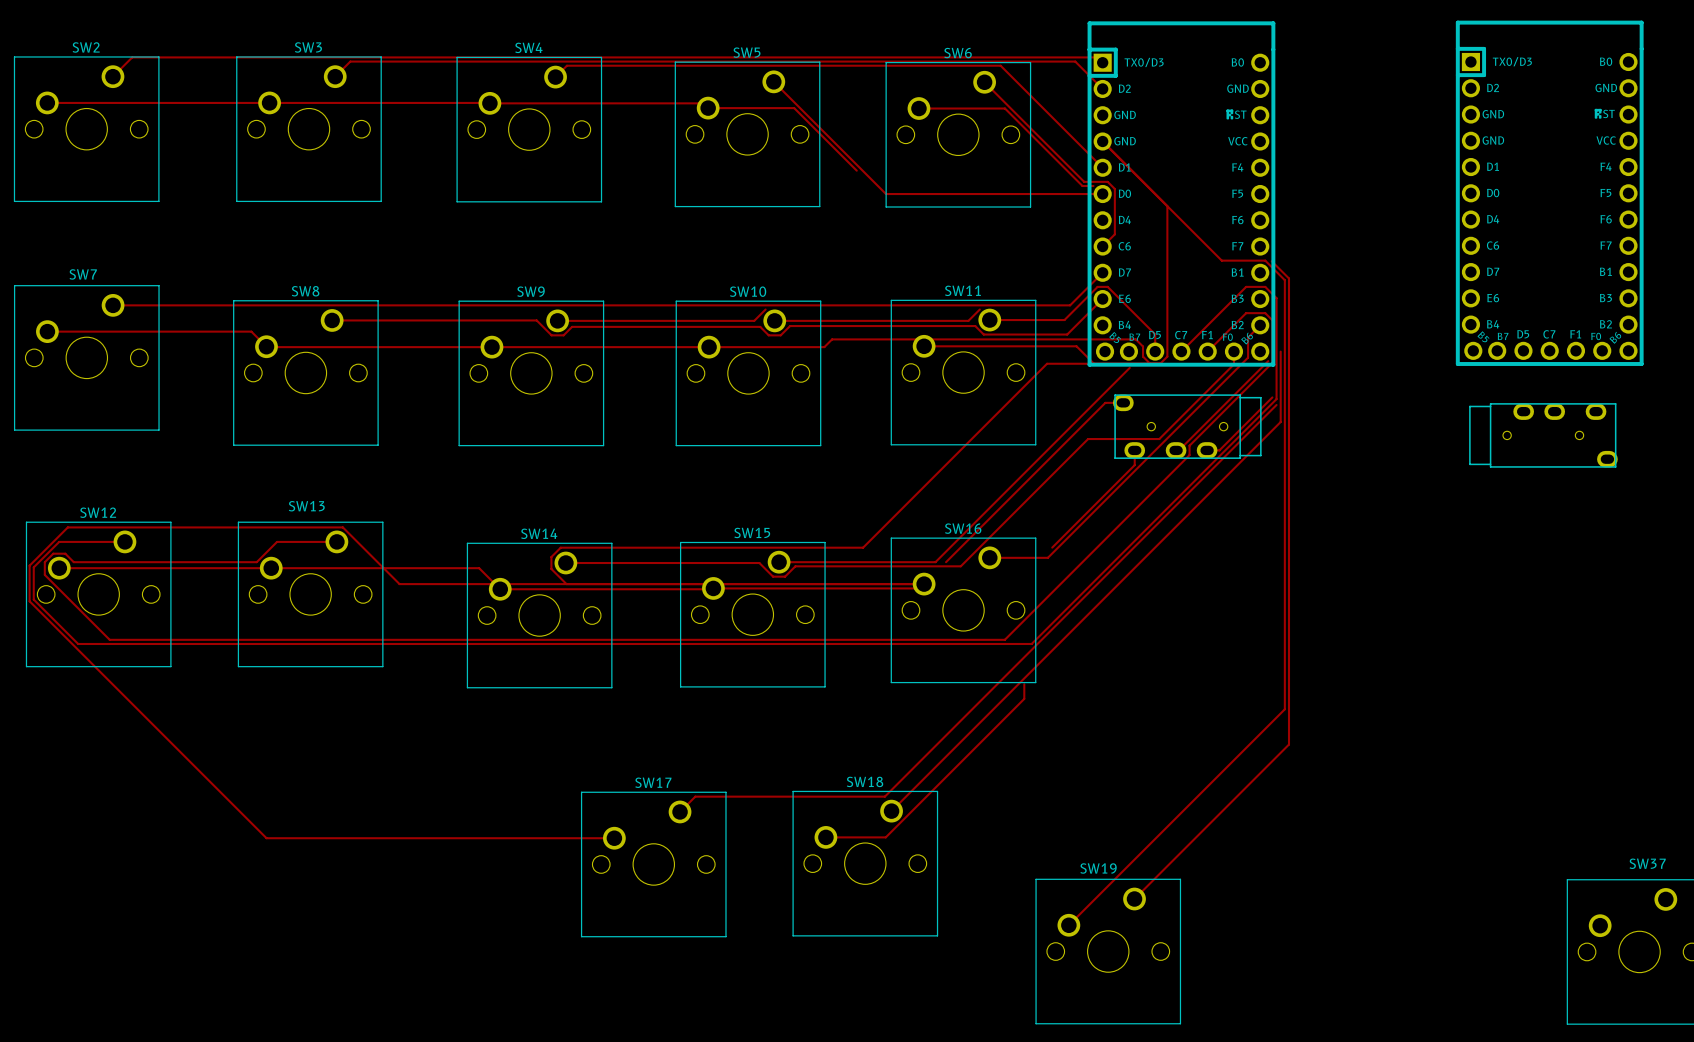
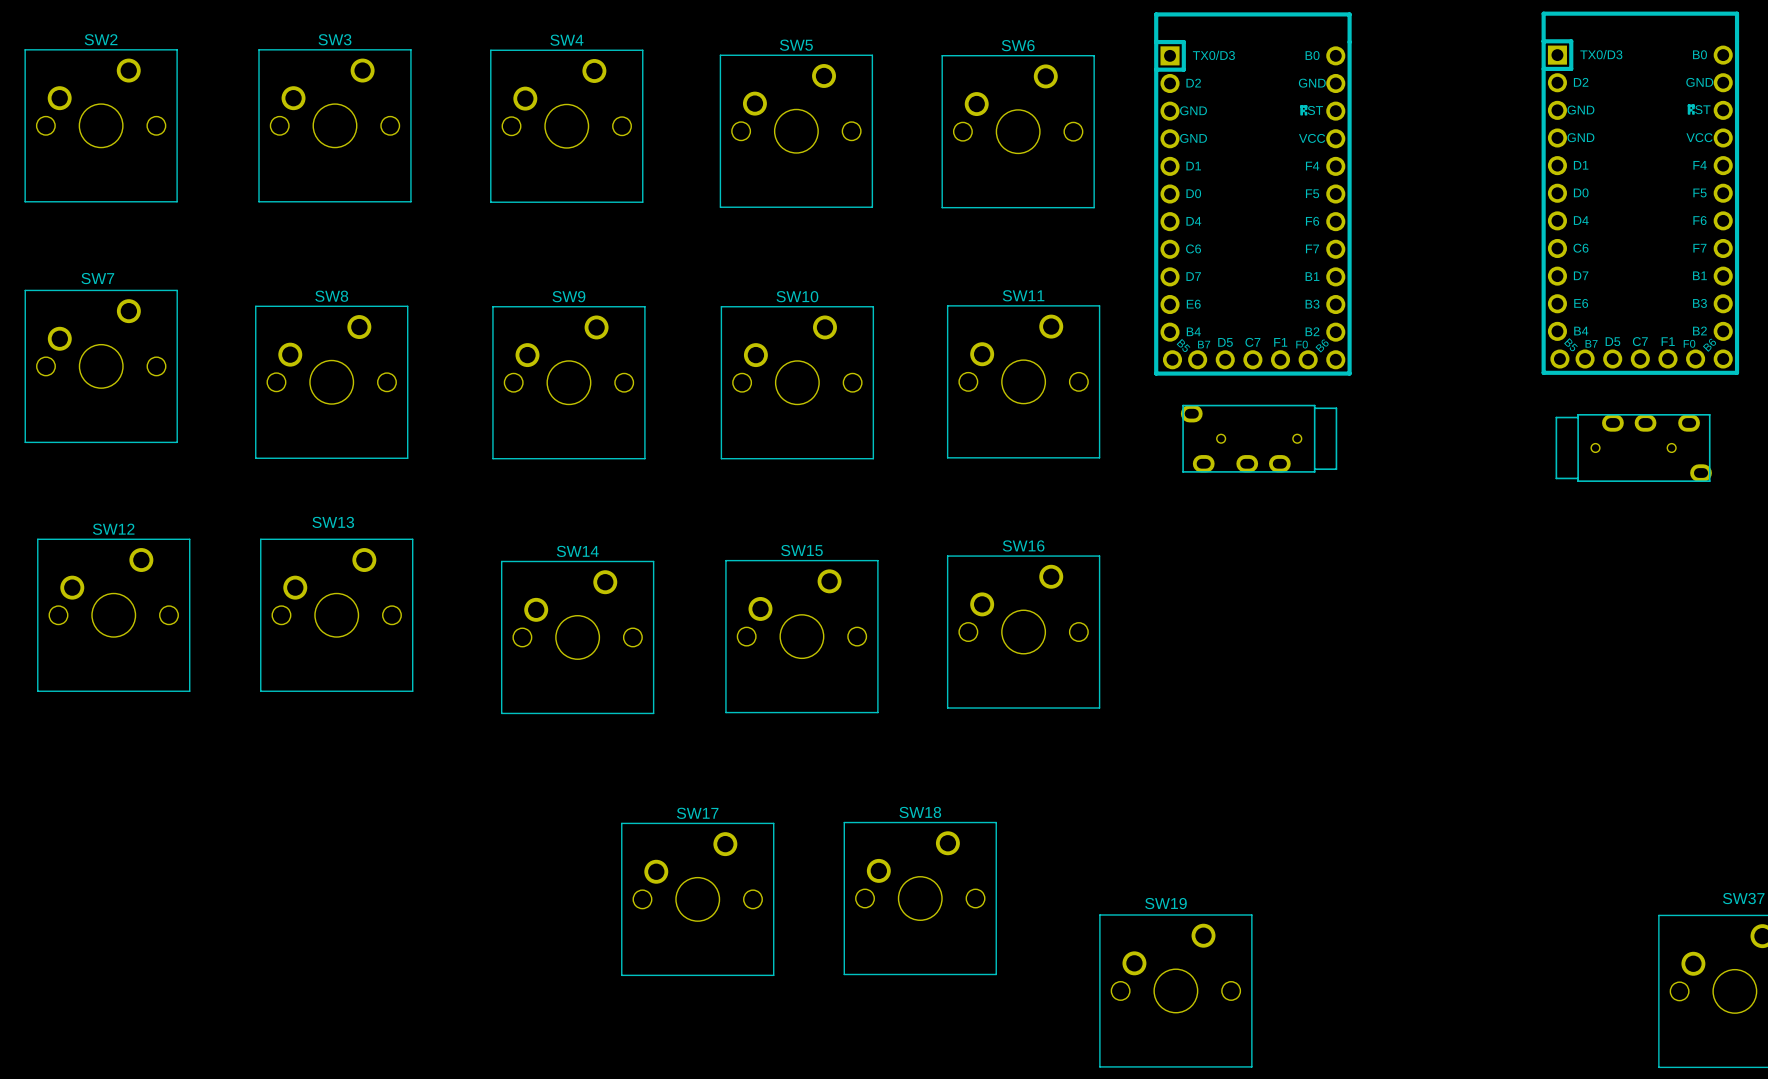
top track: (1102, 62) (1097, 57) (132, 57) (112, 76) -> none
top track: (335, 76) (350, 61) (1075, 61) (1102, 88) -> none
top track: (555, 77) (566, 65) (1000, 65) (1102, 167) -> none
top track: (773, 81) (885, 194) (1102, 194) -> none
top track: (984, 82) (1084, 181) (1107, 181) (1114, 188) (1114, 234) (1102, 246) -> none
top track: (47, 102) (703, 103) (708, 108) (794, 108) (856, 170) -> none
top track: (918, 108) (1005, 108) (1082, 185) (1093, 185) -> none
top track: (1102, 141) (1221, 260) (1265, 260) (1284, 280) (1284, 709) (1068, 925) -> none
top track: (1167, 206) (1167, 356) (1160, 363) (1047, 363) (863, 547) (560, 547) (551, 557) (551, 569) (566, 584) -> none
top track: (1271, 261) (1288, 278) (1288, 744) (1134, 899) -> none
top track: (1102, 272) (1070, 305) (113, 305) -> none
top track: (1102, 299) (1067, 334) (983, 334) (975, 326) (790, 326) (780, 335) (768, 335) (760, 326) (572, 326) (563, 335) (551, 335) (536, 320) (332, 320) -> none
top track: (765, 309) (754, 320) (557, 320) -> none
top track: (979, 309) (968, 320) (774, 320) -> none
top track: (989, 320) (1064, 320) (1097, 286) (1107, 286) (1155, 334) (1155, 351) -> none
top track: (1260, 325) (1248, 337) (1248, 357) (1047, 557) (989, 557) -> none
top track: (47, 331) (251, 331) (266, 346) (277, 347) (824, 347) (832, 339) (1135, 339) (1143, 346) (1143, 356) (1150, 363) -> none
top track: (924, 346) (1076, 346) (1094, 363) -> none
top track: (1181, 351) (1246, 286) (1265, 286) (1276, 298) (1276, 399) (1031, 643) (78, 643) (33, 599) (33, 567) (59, 541) (124, 541) -> none
top track: (1207, 351) (1246, 313) (1265, 313) (1272, 320) (1272, 362) (1189, 445) (1189, 455) (1004, 639) (109, 639) (44, 574) (44, 562) (53, 553) (65, 553) (73, 562) (256, 562) (277, 541) (336, 541) -> none
top track: (1233, 351) (1233, 364) (1159, 439) (1088, 439) (960, 566) (795, 566) (785, 576) (773, 576) (759, 563) (565, 563) -> none
top track: (1280, 351) (1280, 421) (891, 811) -> none
top track: (1268, 361) (1178, 450) (1176, 450) -> none
top track: (1129, 367) (935, 562) (779, 562) -> none
top track: (1272, 397) (1219, 450) (1207, 450) -> none
top track: (1123, 402) (1105, 402) (946, 562) -> none
top track: (1276, 404) (884, 796) (695, 796) (680, 811) -> none
top track: (1134, 450) (1134, 465) (1052, 547) -> none
top track: (59, 568) (479, 568) (500, 589) (919, 588) (924, 584) (399, 584) (342, 527) (67, 527) (29, 565) (29, 601) (266, 838) (614, 838) -> none
top track: (1024, 684) (1024, 698) (885, 837) (825, 837) -> none

